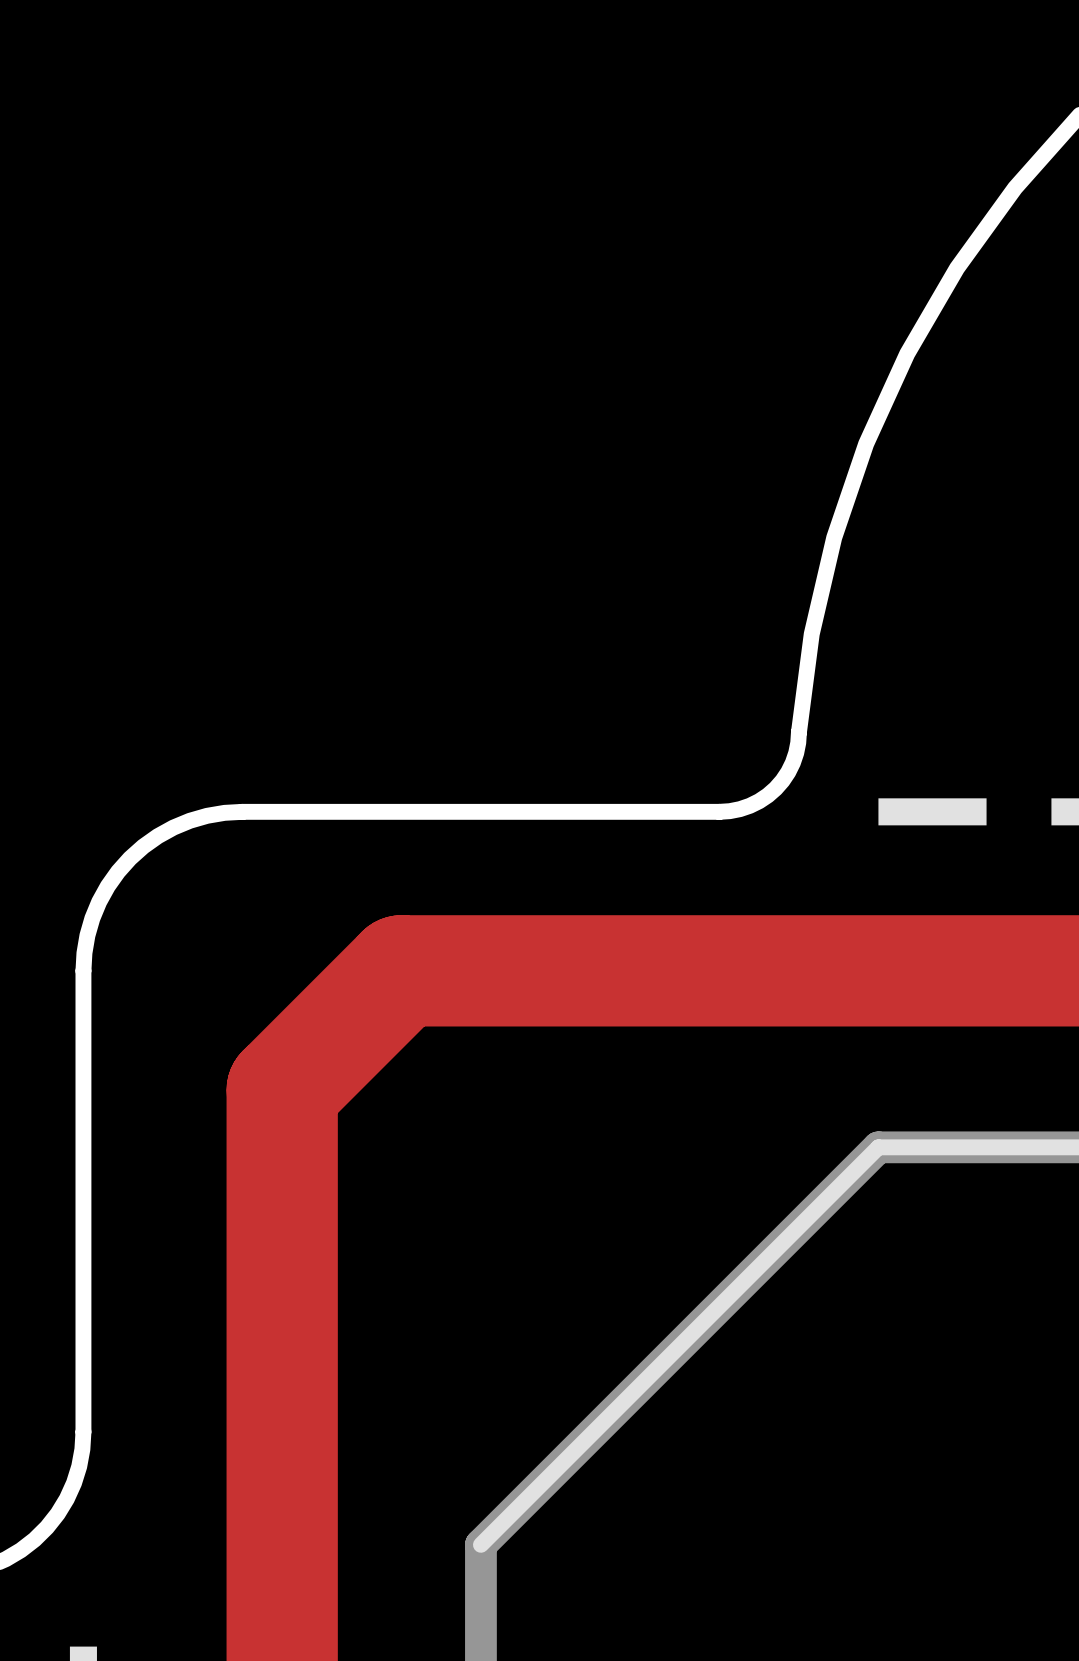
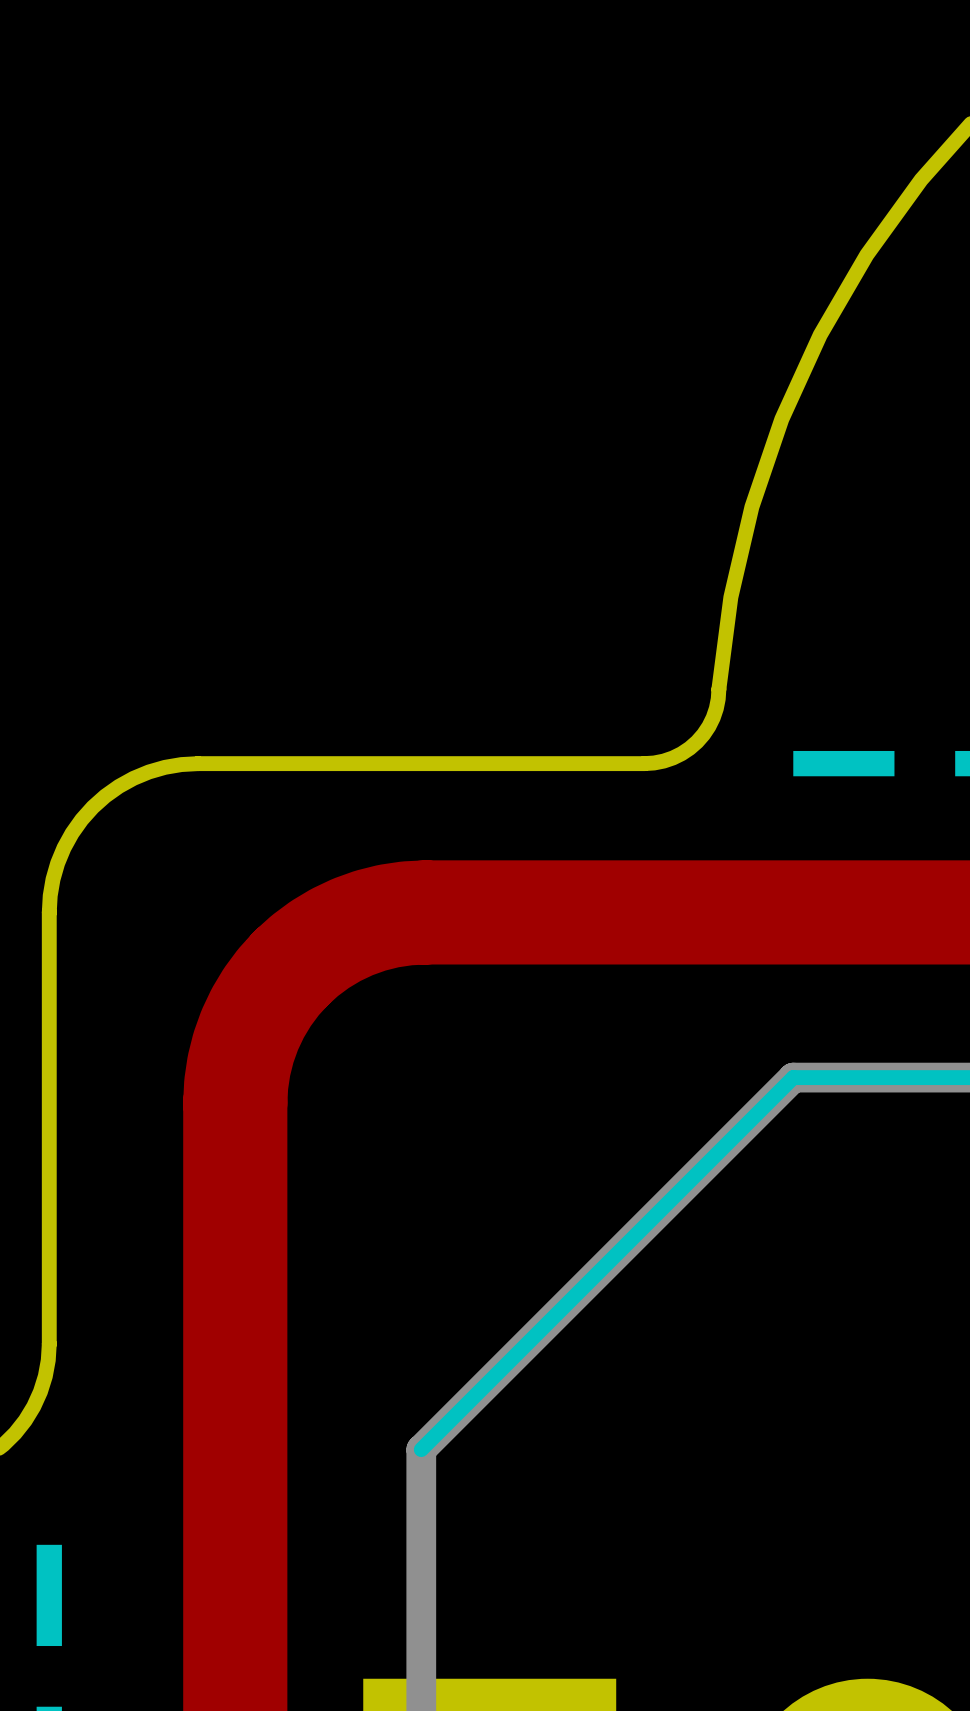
track: (485, 970) (401, 970) (282, 1090) (282, 1174) -> (425, 912) (388, 916) (352, 926) (319, 944) (291, 968) (267, 997) (249, 1030) (238, 1065) (235, 1102)

